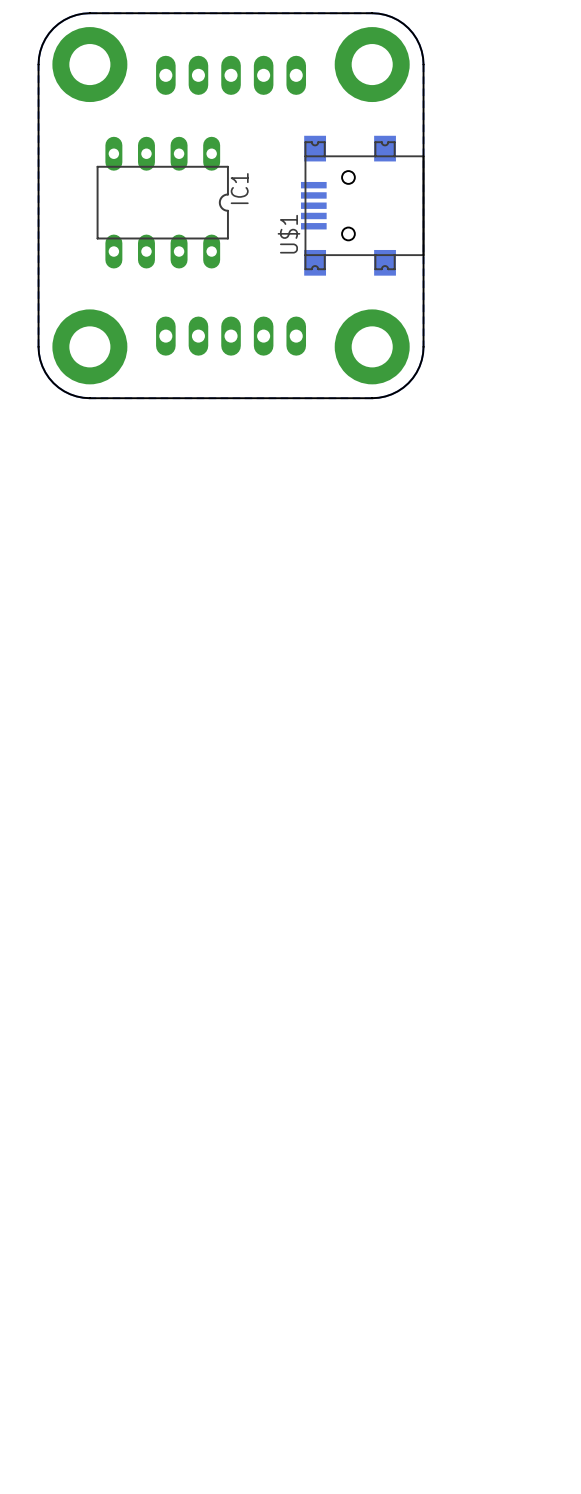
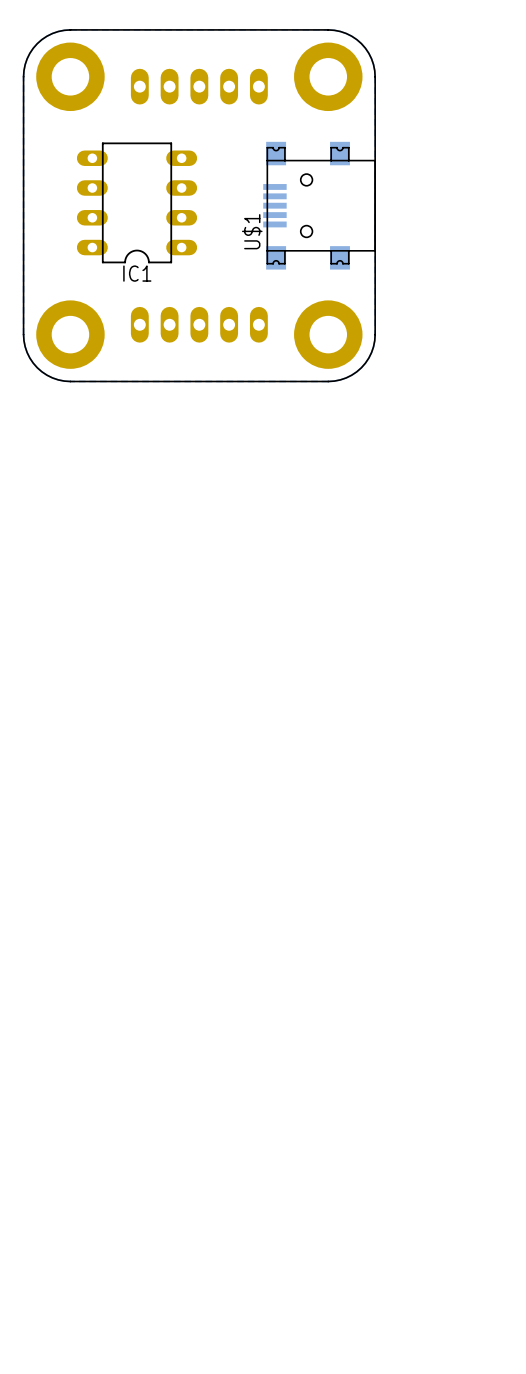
IC1 footprint: [96, 136, 229, 269] -> [76, 142, 198, 264]
IC1 name position: IC1 (239, 188) -> IC1 (137, 273)

